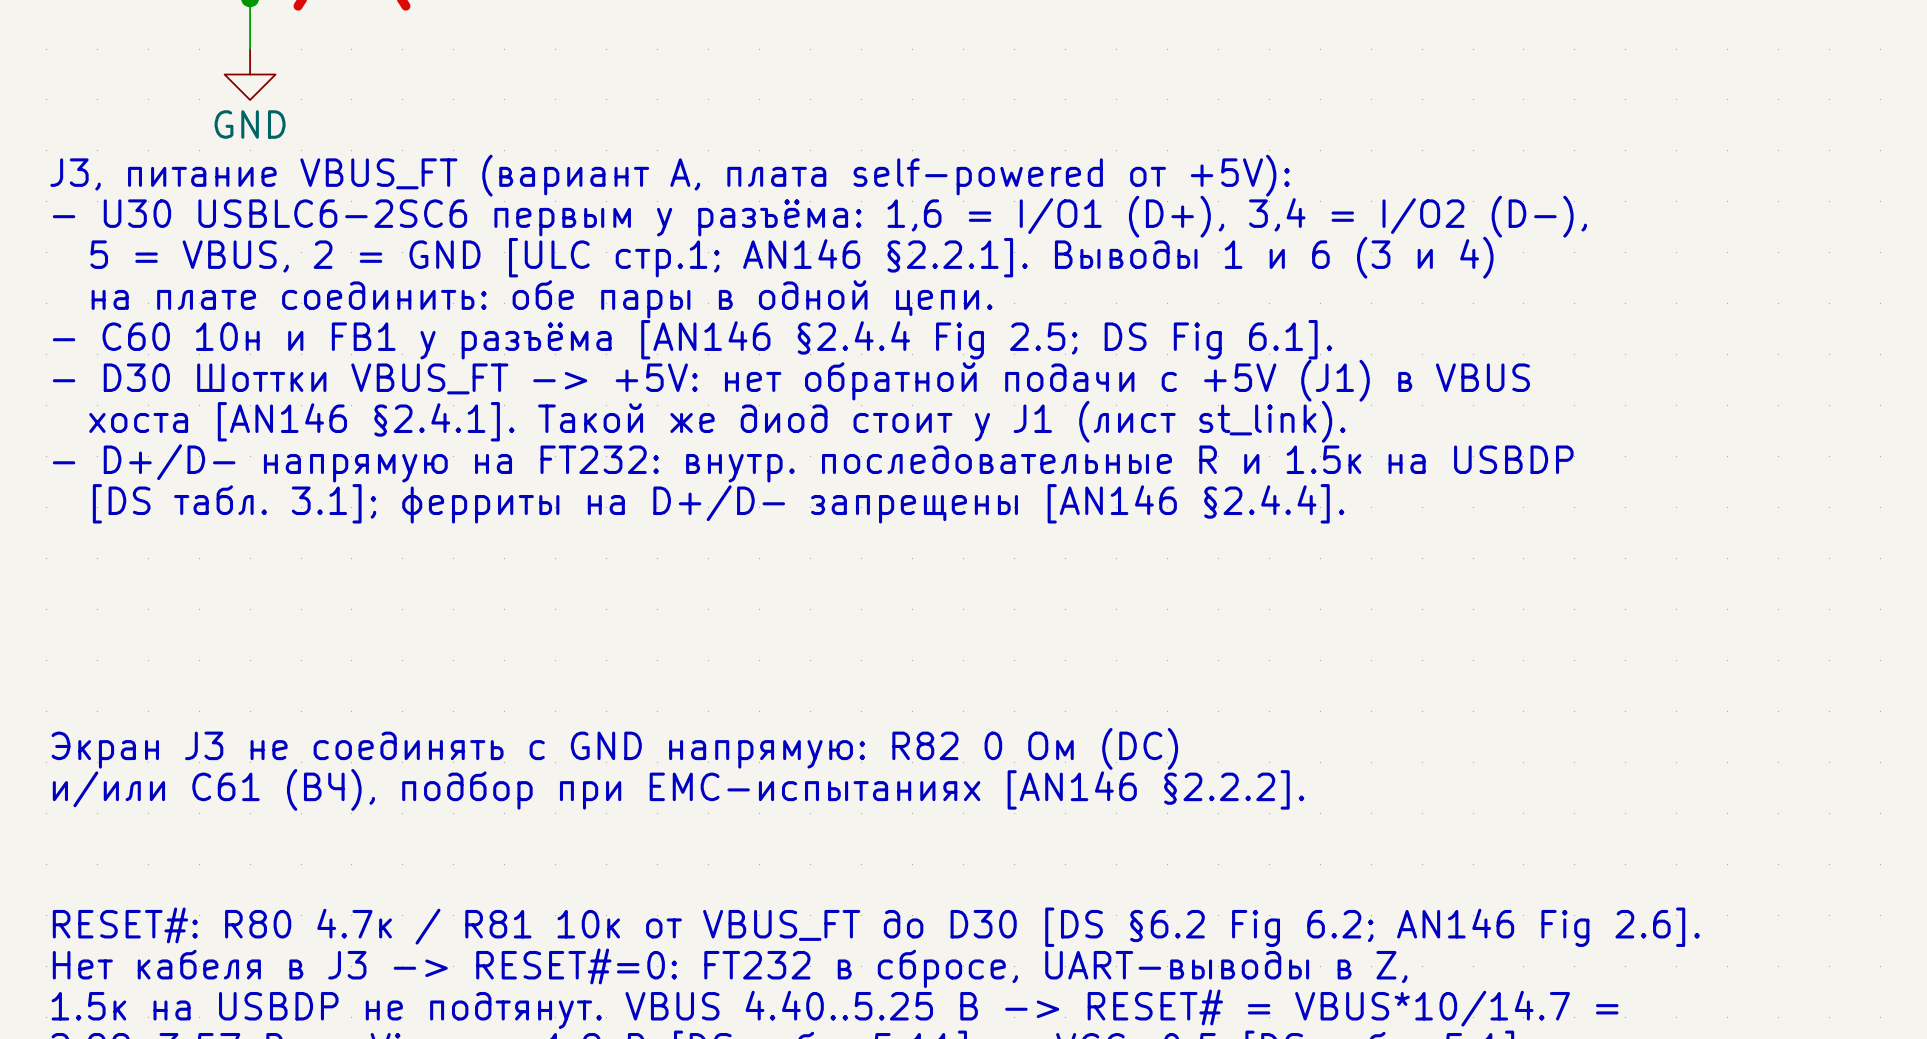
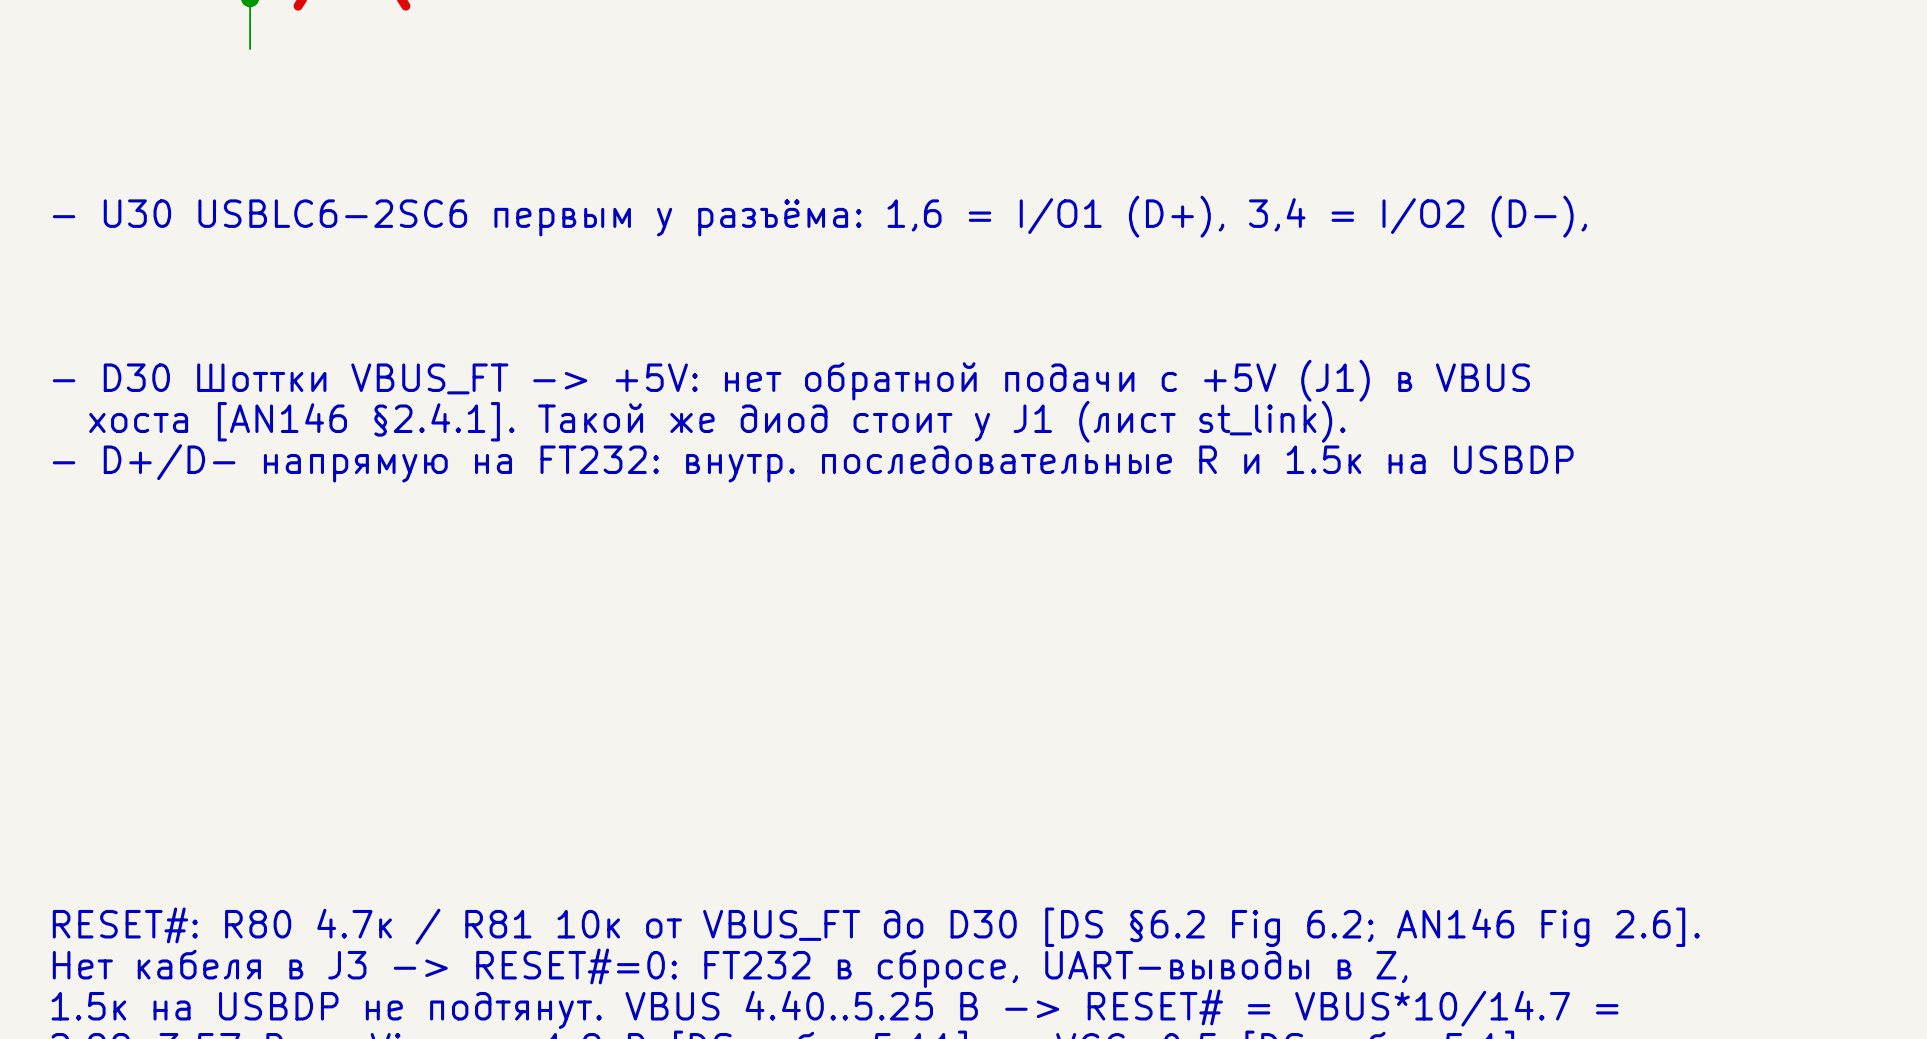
power symbol: GND (250, 74) -> none
text: J3, питание VBUS_FT (вариант A, плата self-powered от +5V): (670, 175) -> none
text: 5 = VBUS, 2 = GND [ULC стр.1; AN146 §2.2.1]. Выводы 1 и 6 (3 и 4) (791, 257) -> none
text: на плате соединить: обе пары в одной цепи. (542, 299) -> none
text: - C60 10н и FB1 у разъёма [AN146 §2.4.4 Fig 2.5; DS Fig 6.1]. (692, 339) -> none
text: [DS табл. 3.1]; ферриты на D+/D- запрещены [AN146 §2.4.4]. (718, 503) -> none
text: Экран J3 не соединять с GND напрямую: R82 0 Ом (DC) (614, 748) -> none
text: и/или C61 (ВЧ), подбор при EMC-испытаниях [AN146 §2.2.2]. (678, 789) -> none

